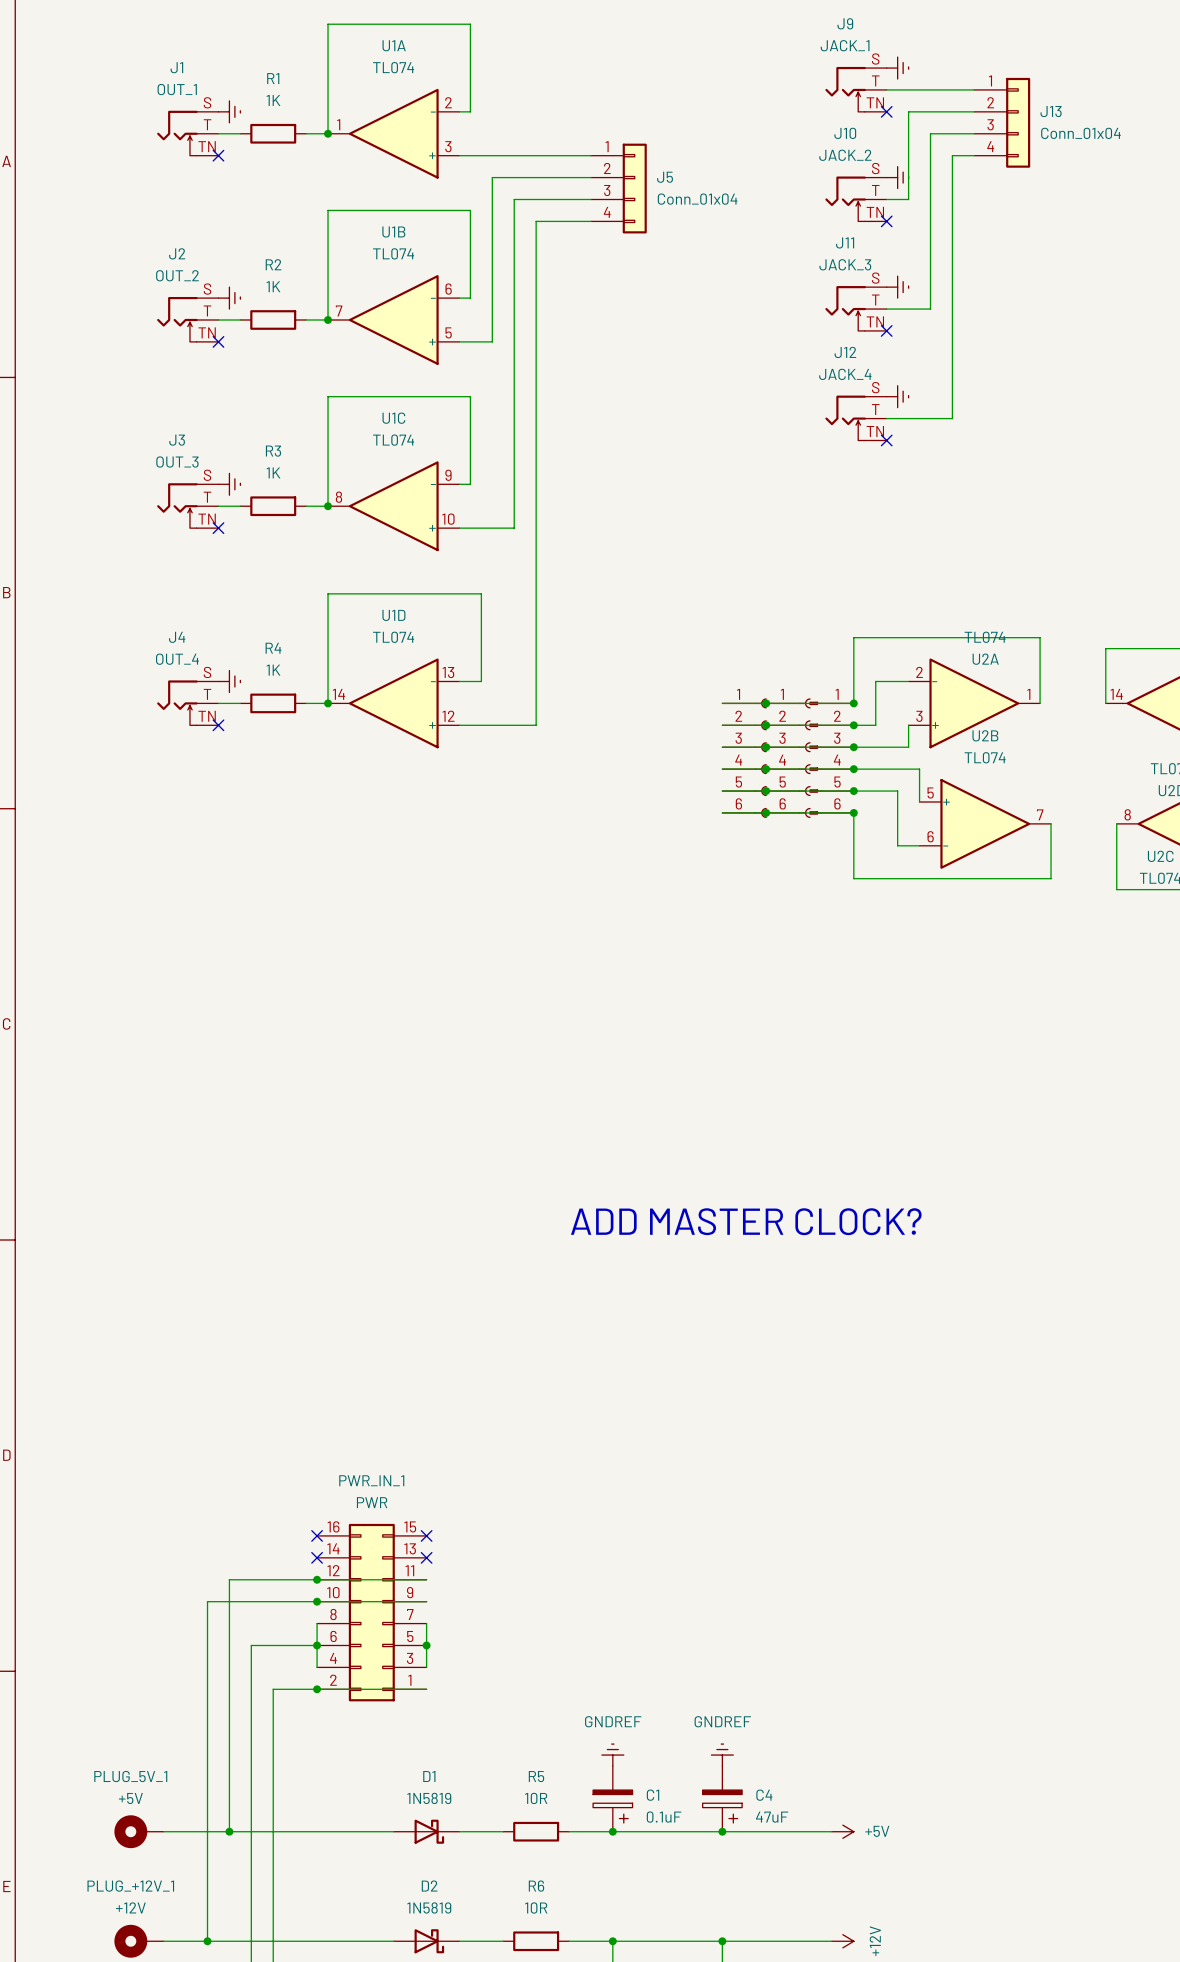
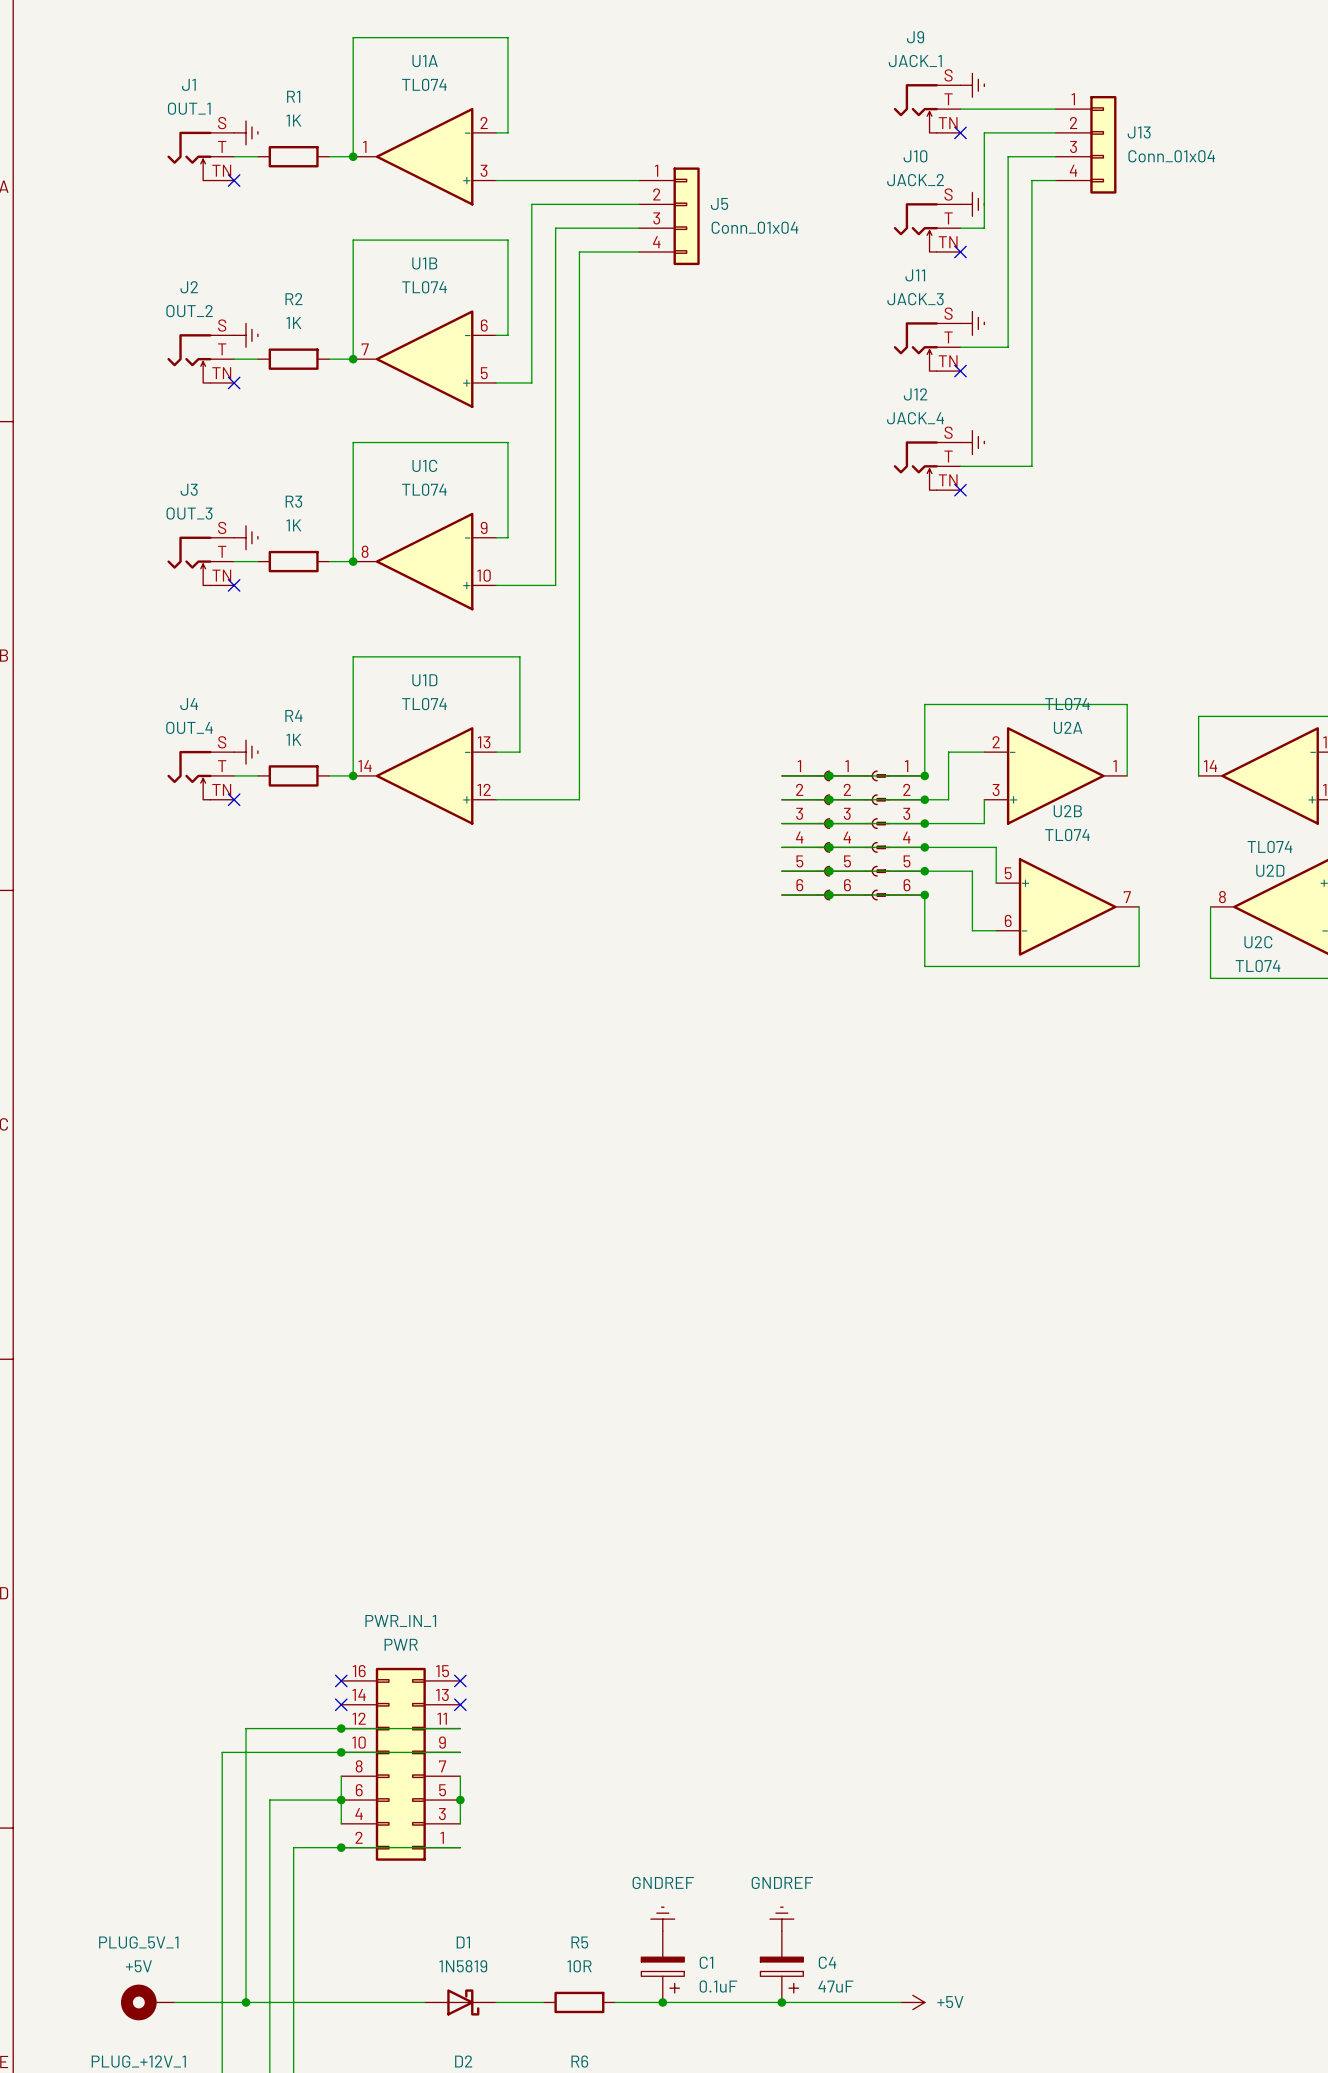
text: ADD MASTER CLOCK? (746, 1221) -> none

